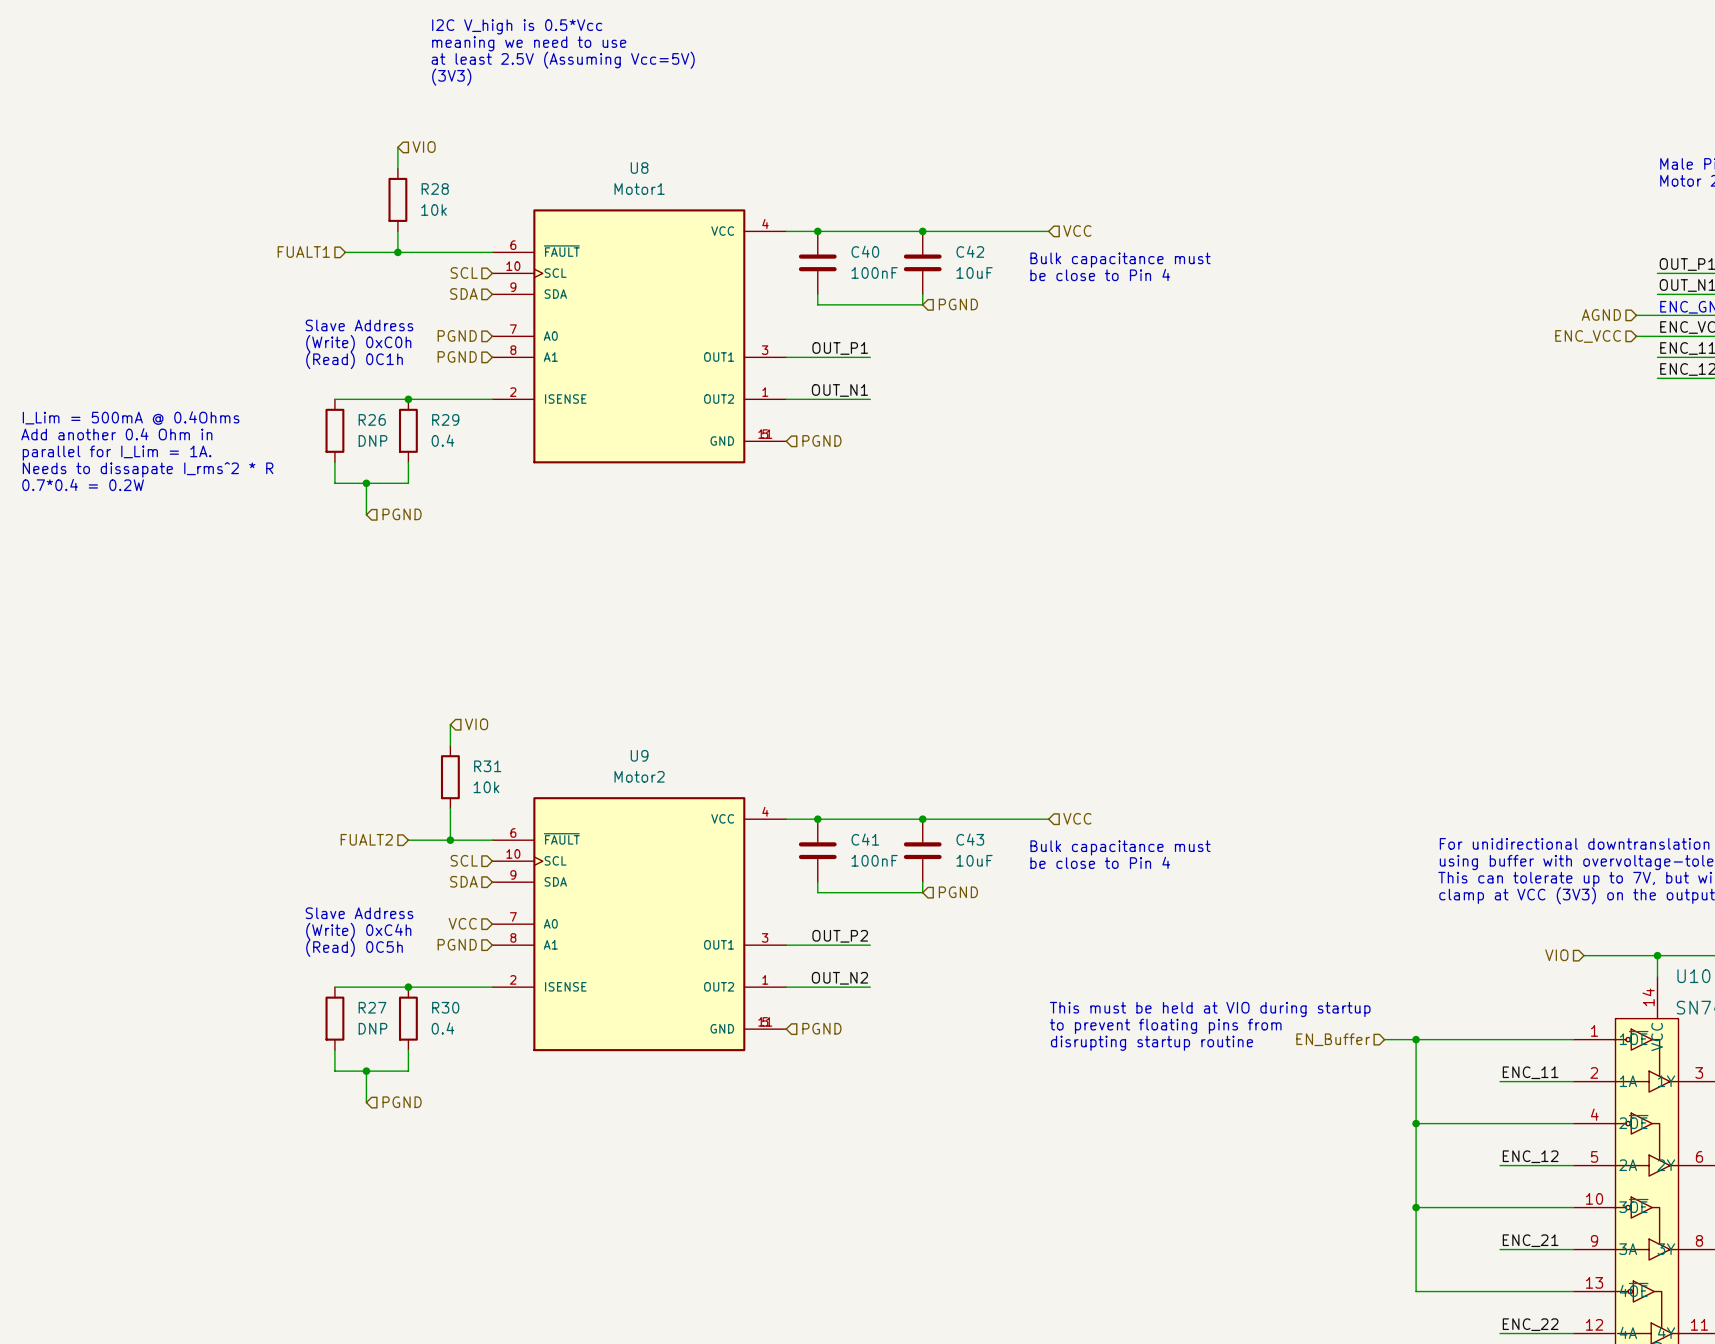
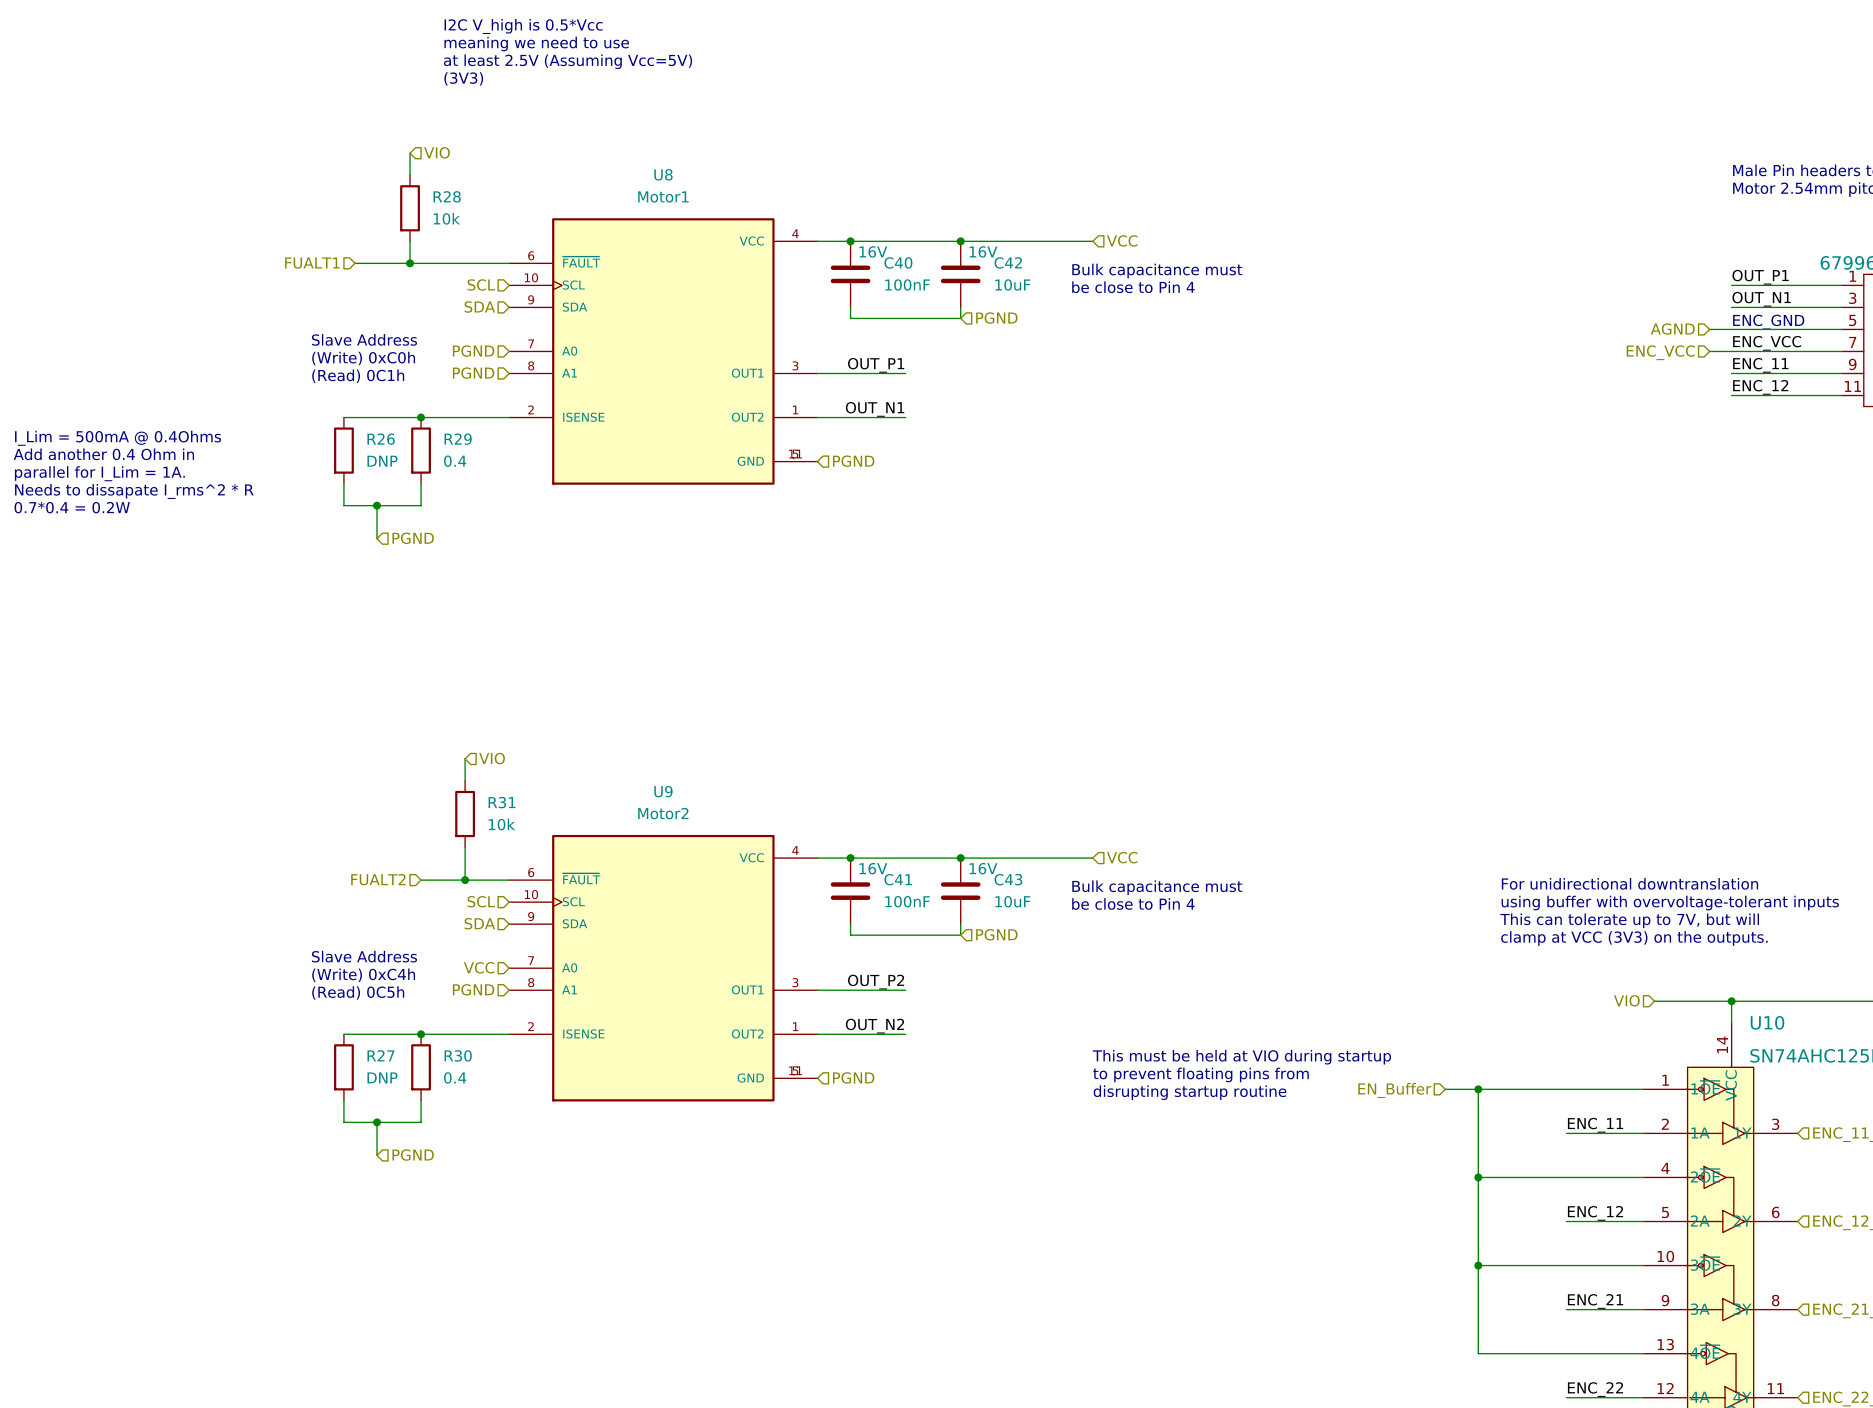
C40 text: none -> 16V (873, 251)
C42 text: none -> 16V (983, 251)
C41 text: none -> 16V (873, 868)
C43 text: none -> 16V (983, 868)

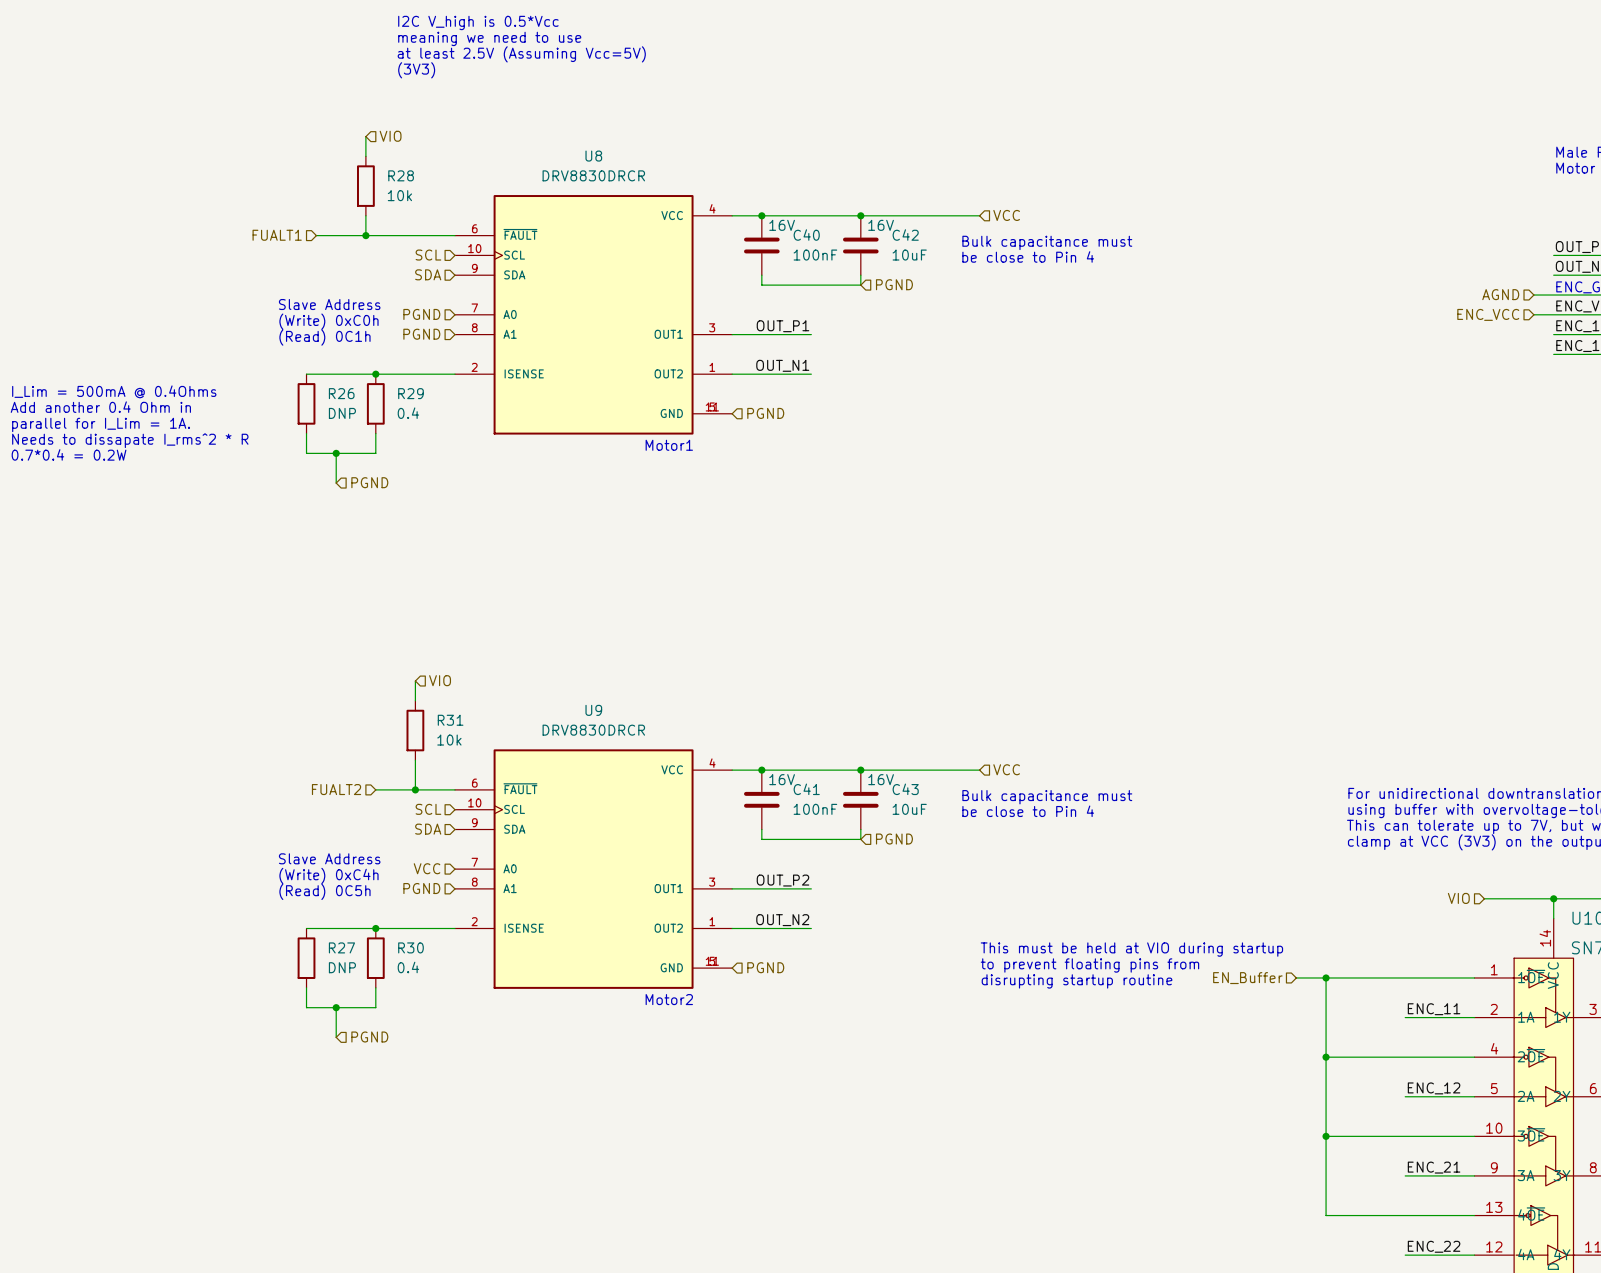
U8 value: Motor1 (663, 196) -> DRV8830DRCR (593, 175)
text: none -> Motor1 (669, 445)
U9 value: Motor2 (663, 813) -> DRV8830DRCR (593, 730)
text: none -> Motor2 (669, 999)

